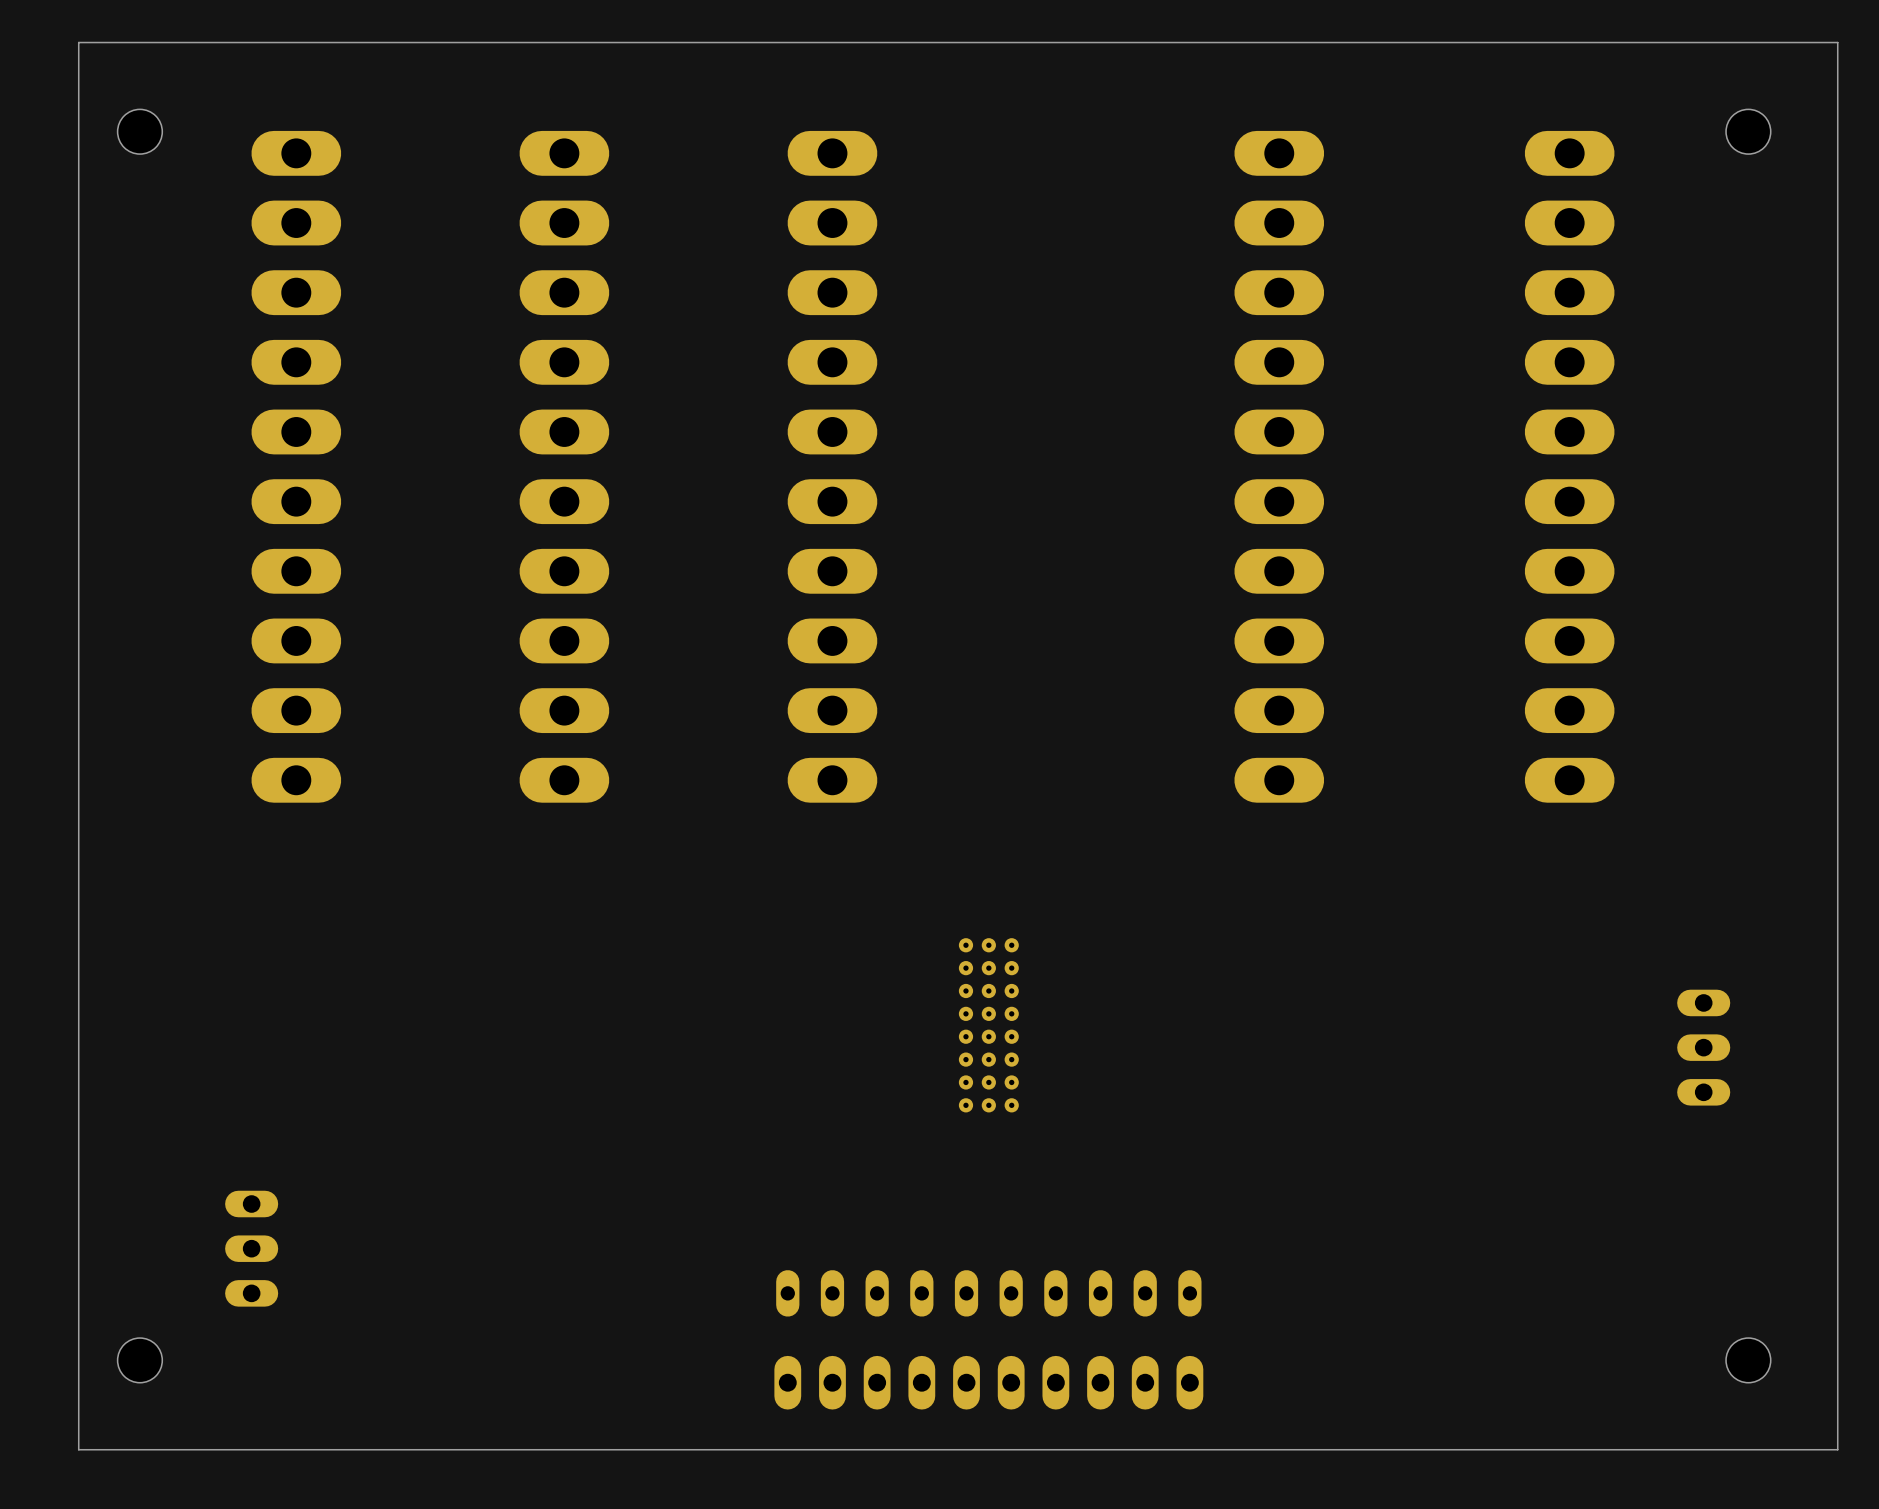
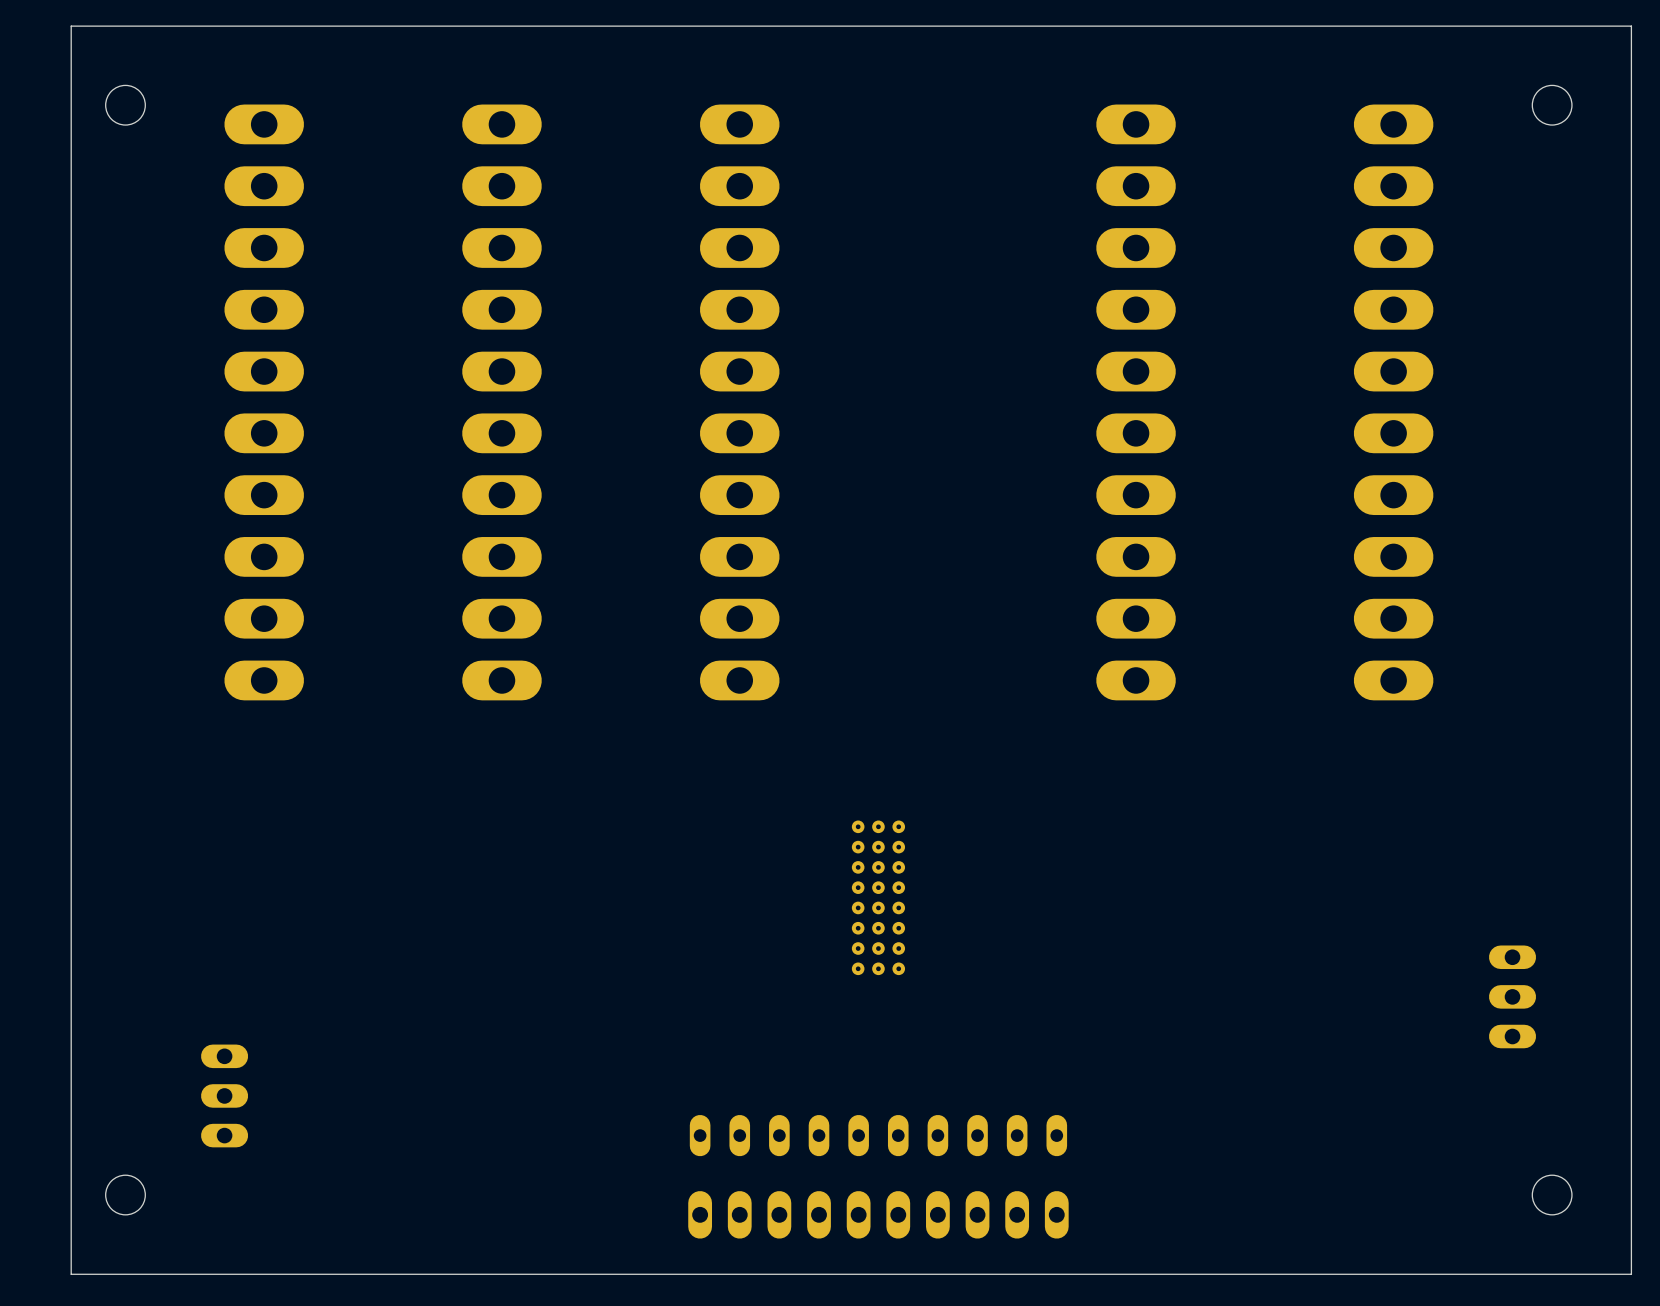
part position: (1703, 1047) -> (1512, 996)

